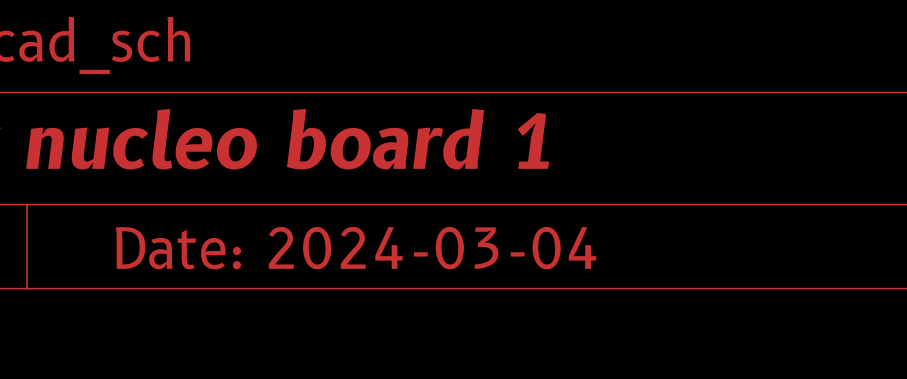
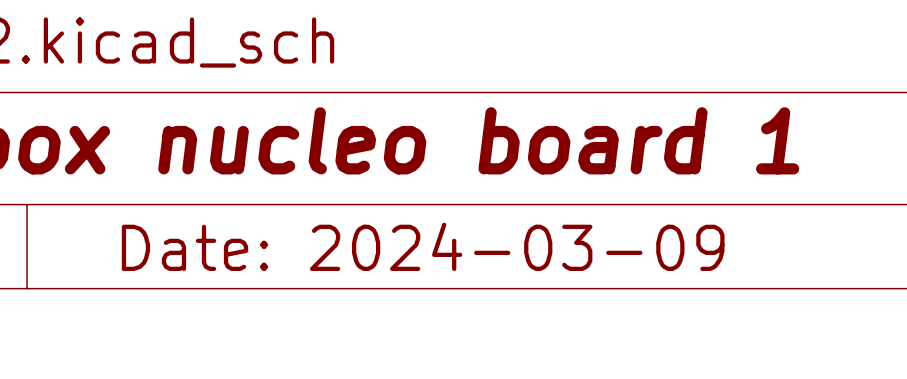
title block: Date: 2024-03-04 (356, 248) -> Date: 2024-03-09 (423, 246)

